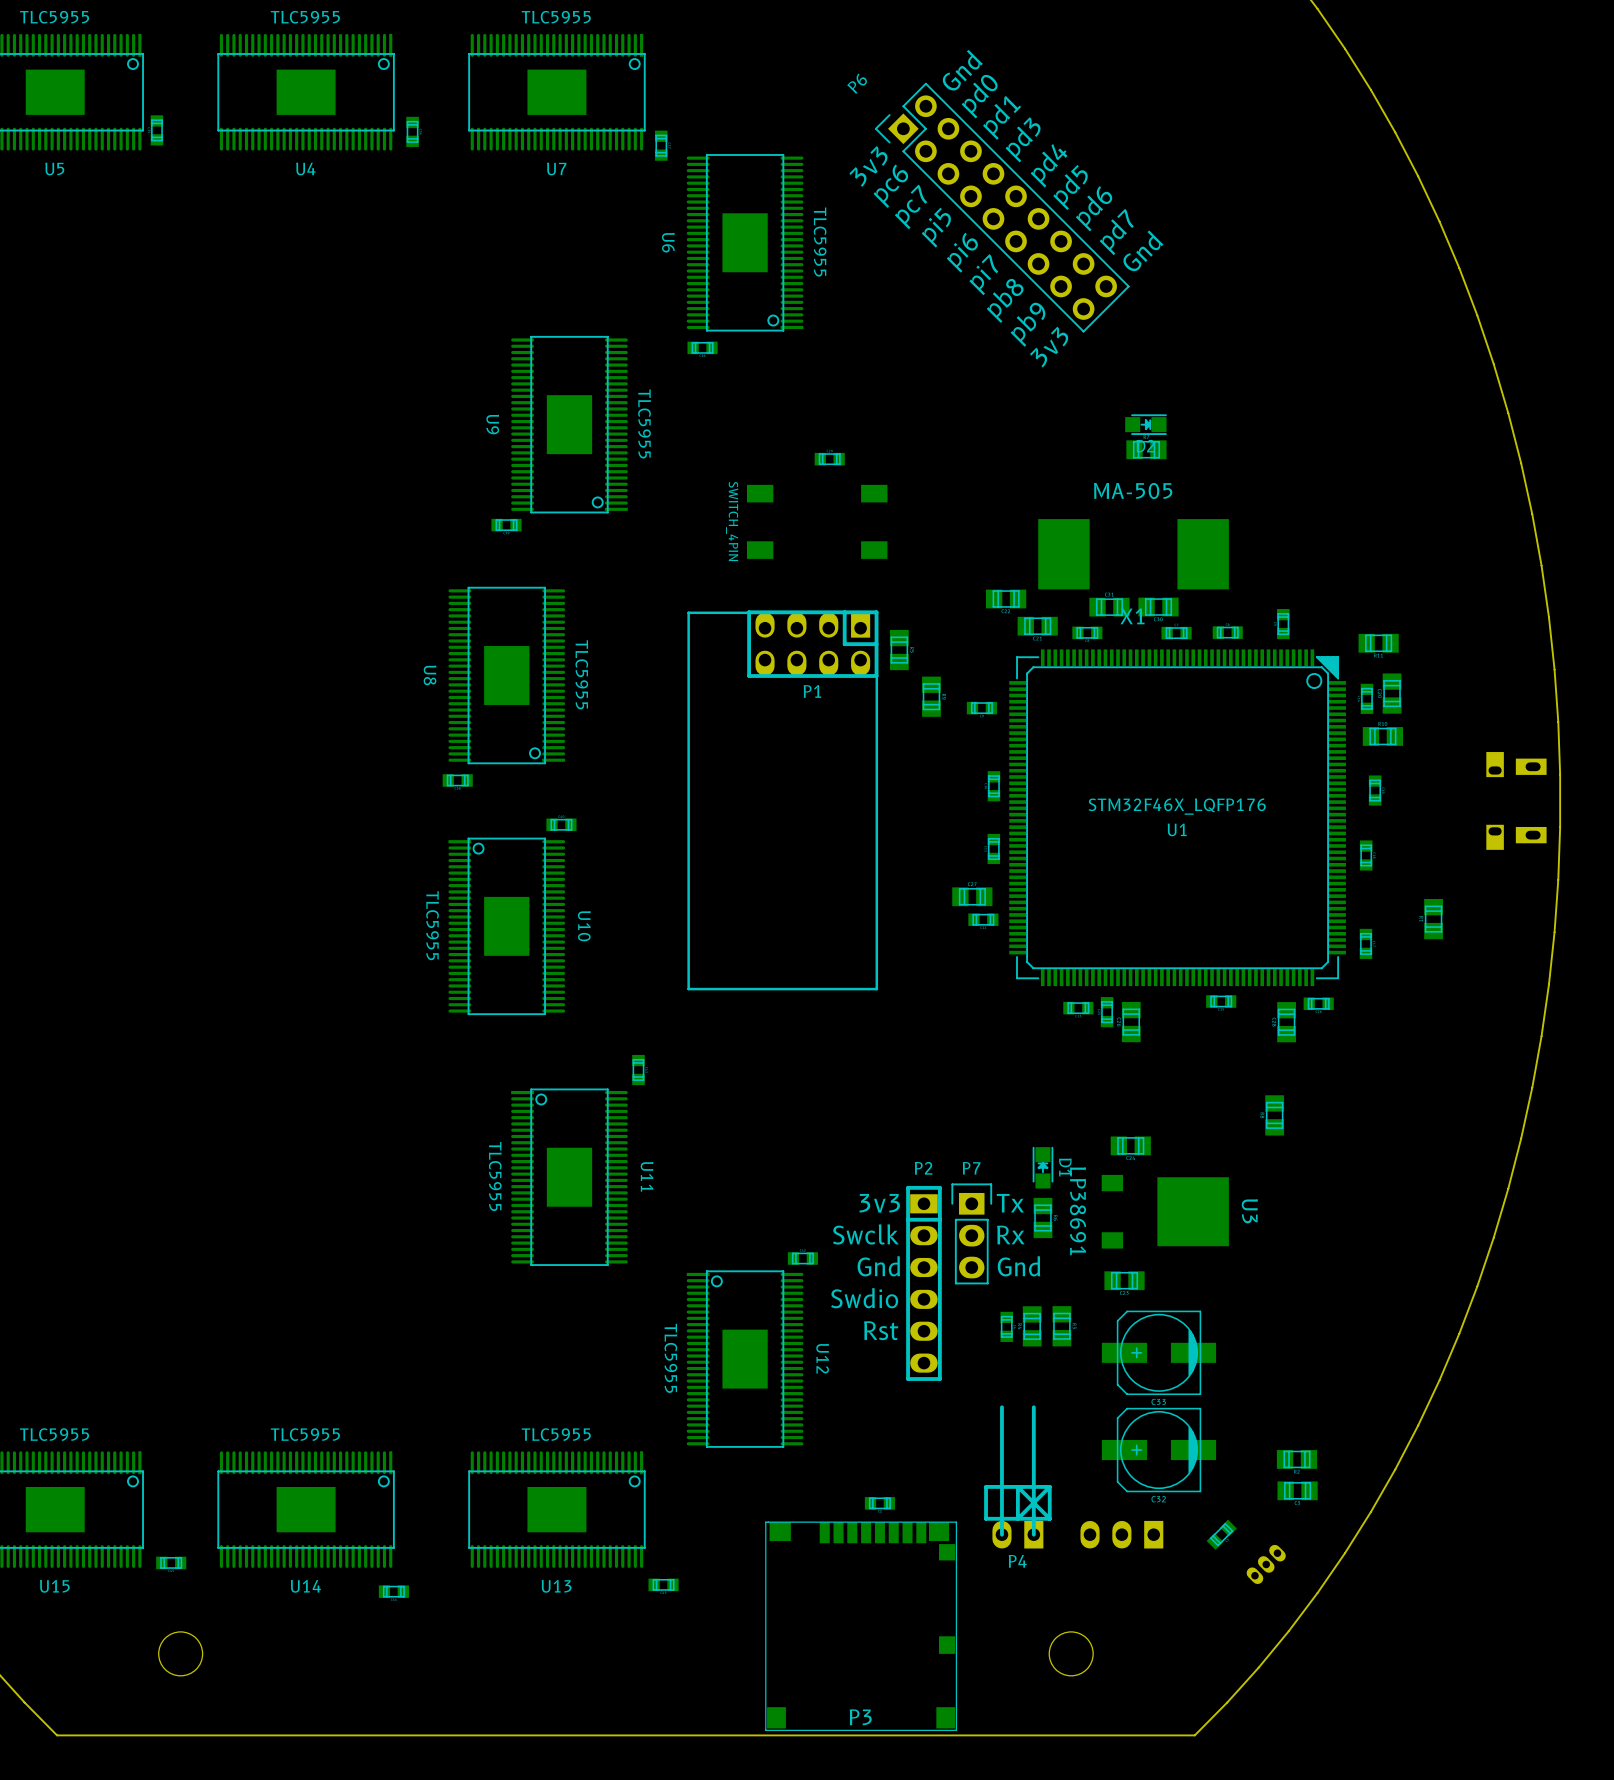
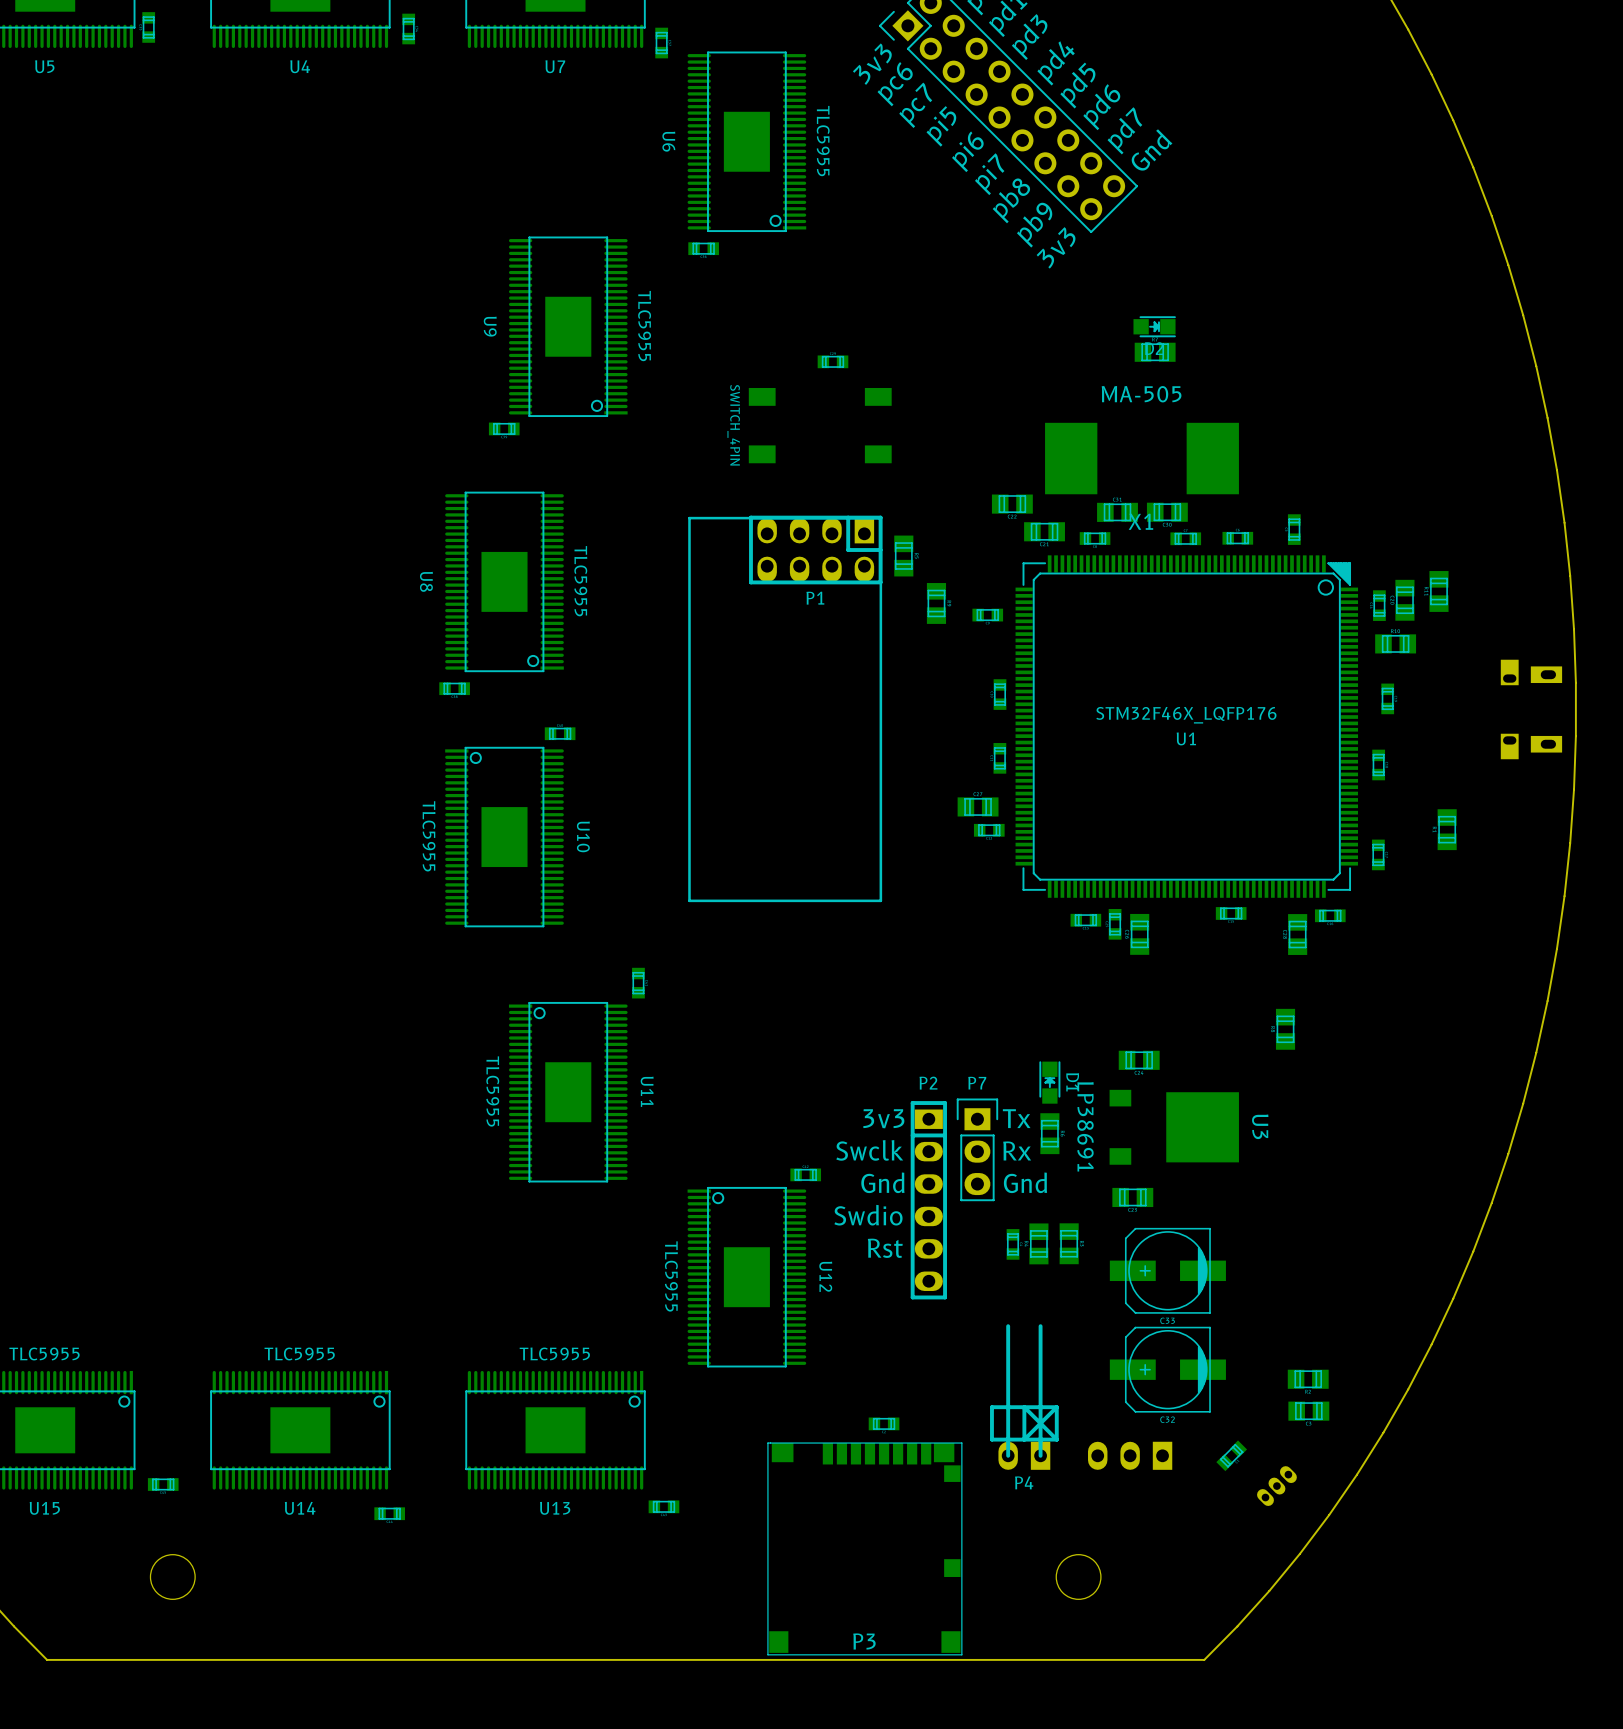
part rotation: 0° (1378, 643) -> 90° clockwise (1438, 591)
part position: (1378, 643) -> (1438, 591)

